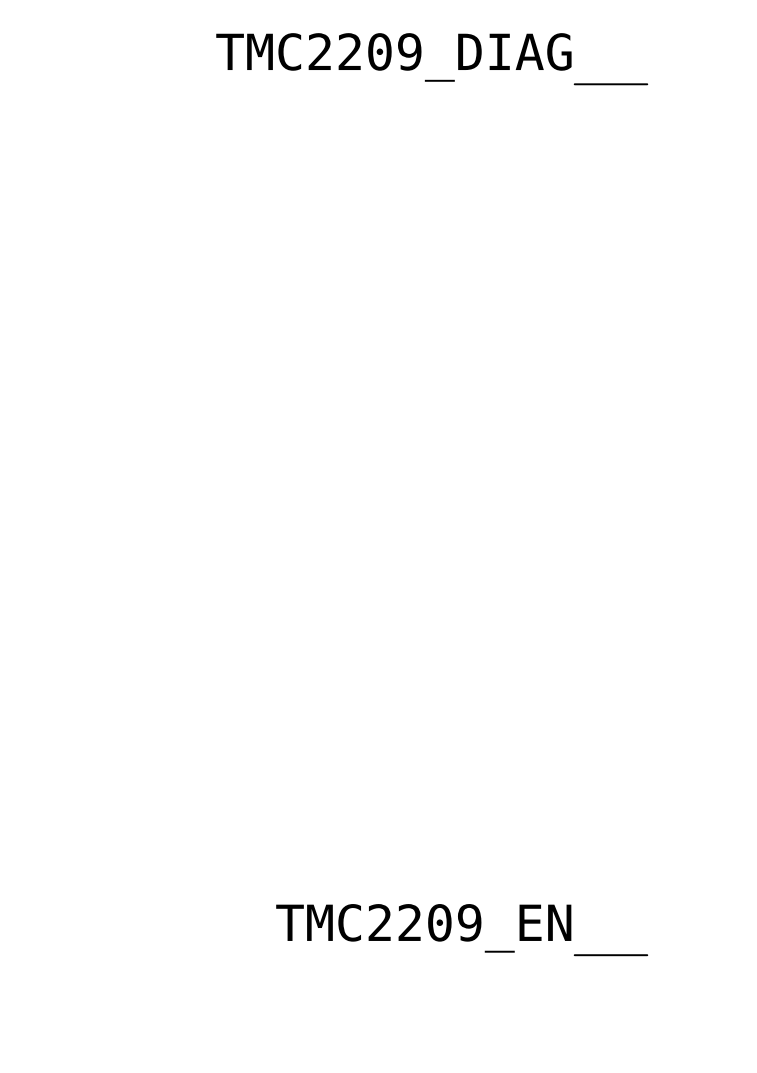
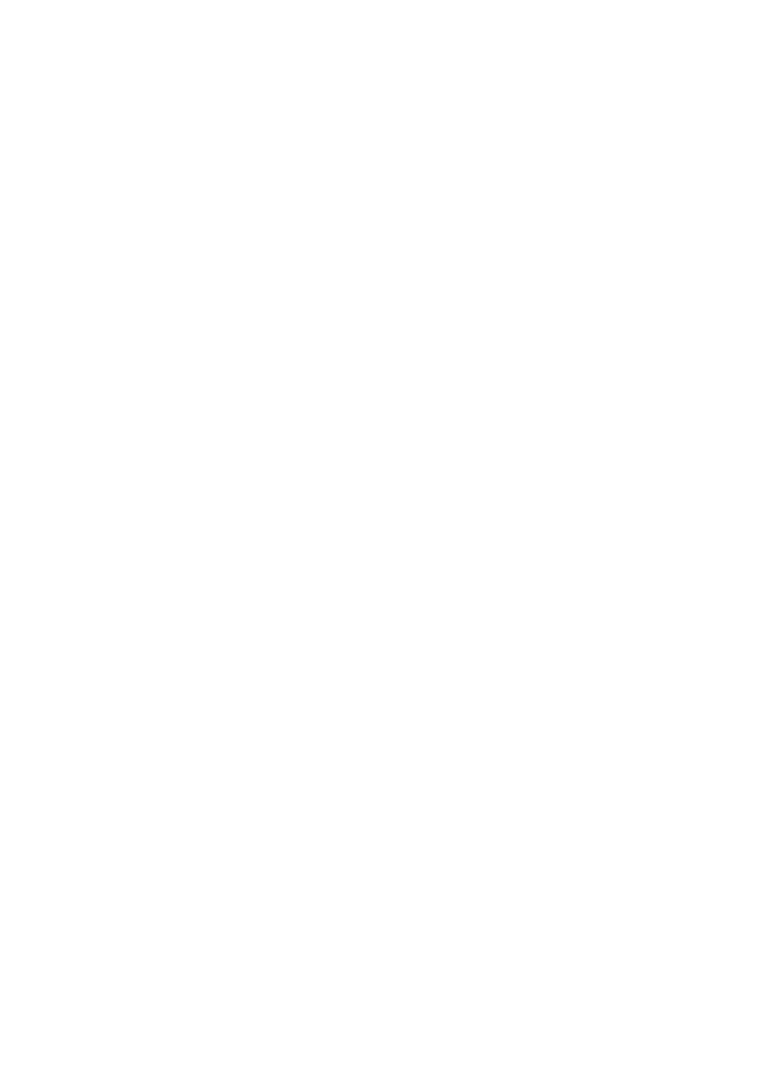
label: TMC2209_DIAG (393, 57) -> none
wire: (574, 84) (647, 84) -> none
label: TMC2209_EN (423, 928) -> none
wire: (574, 955) (647, 955) -> none

